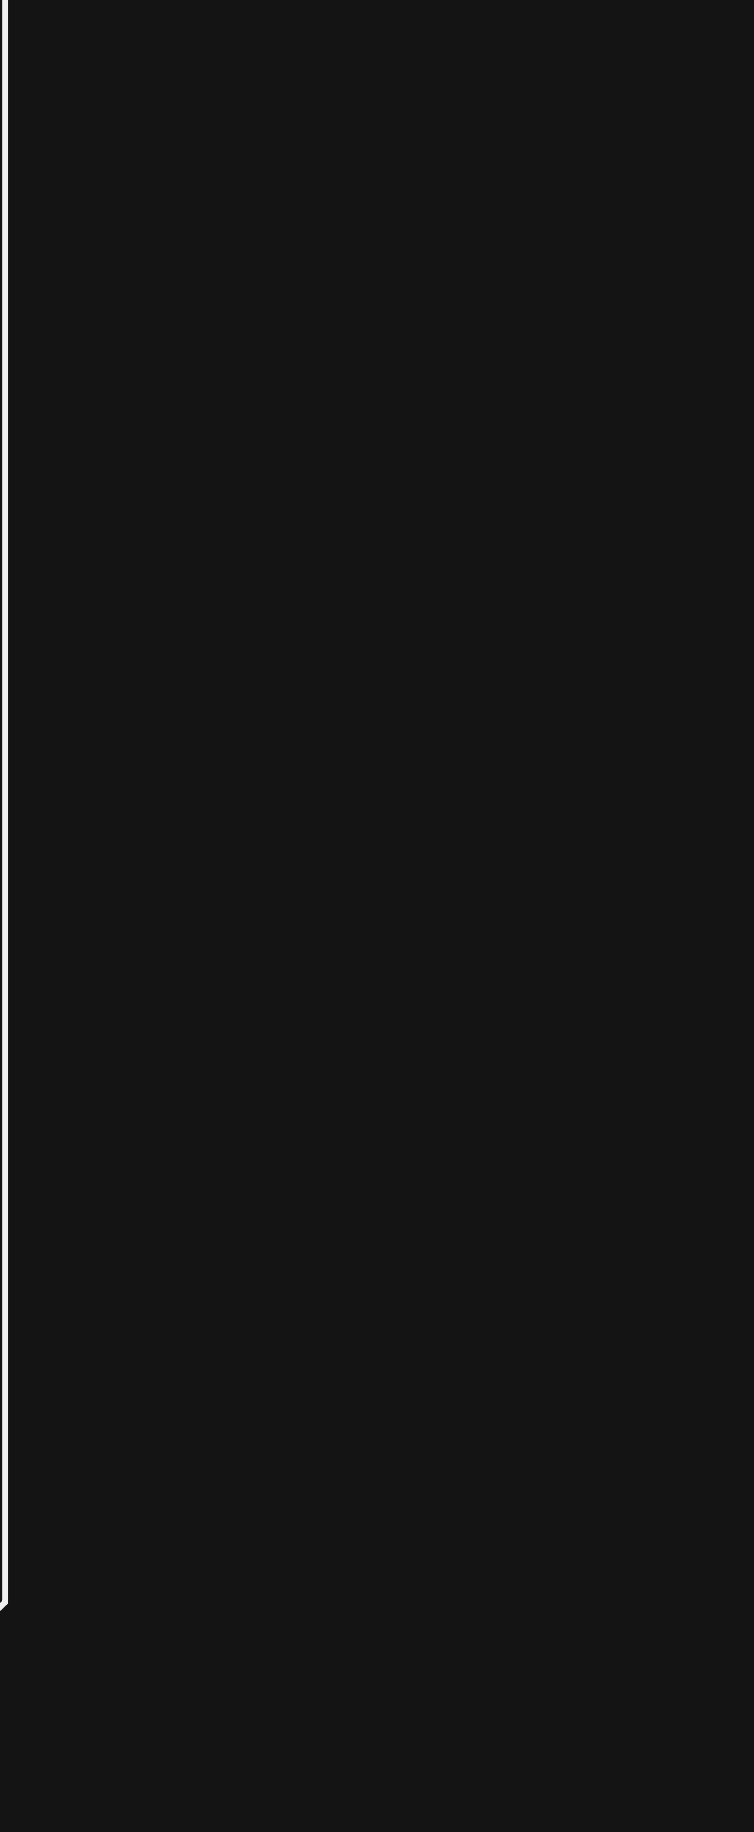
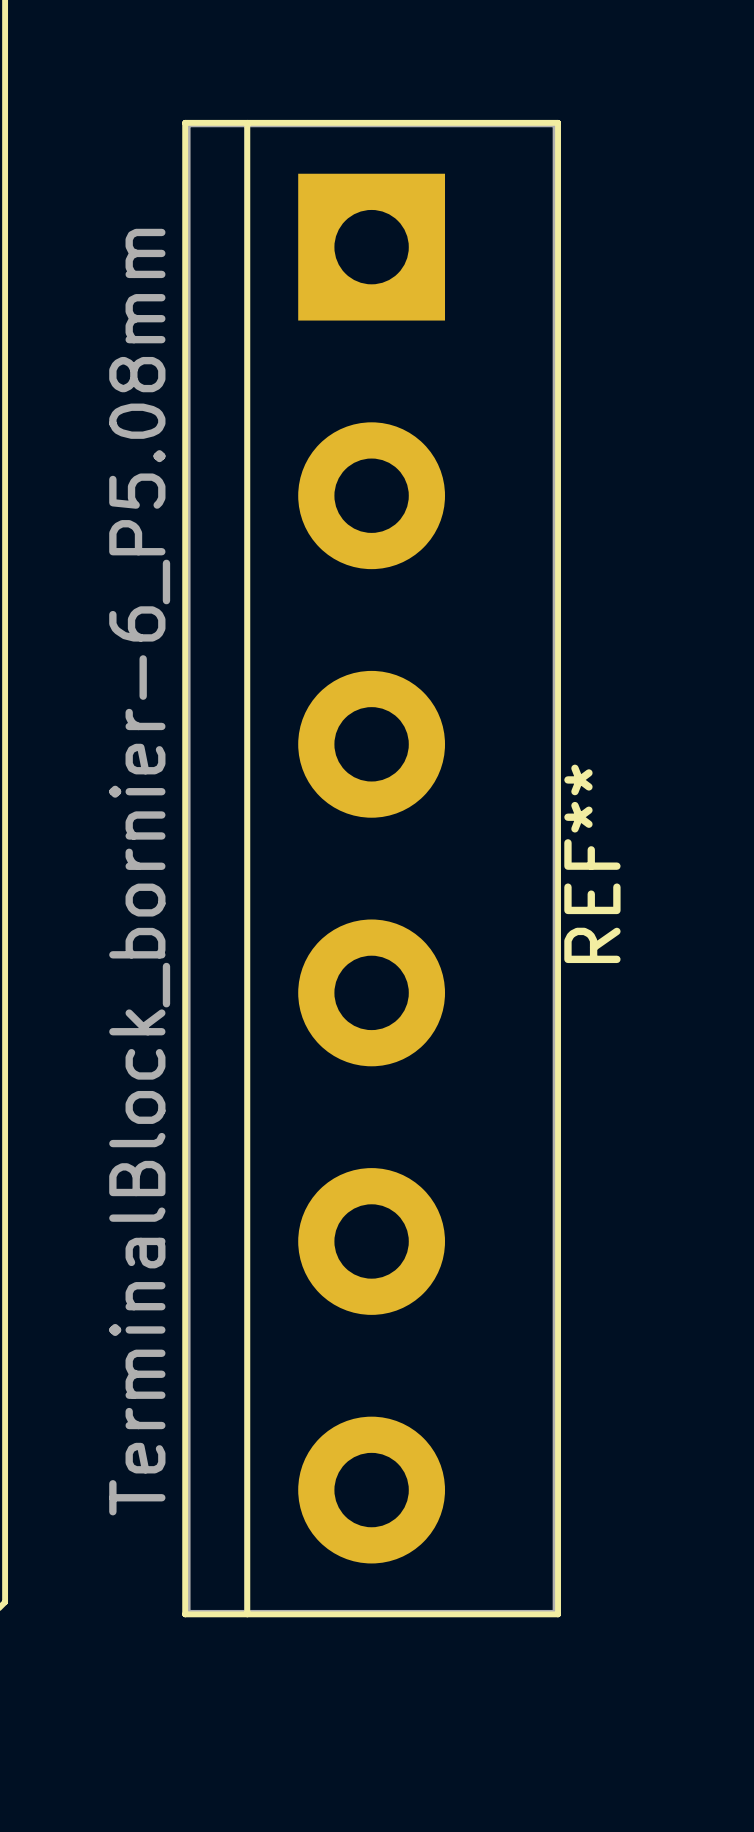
REF**: none -> TerminalBlock_bornier-6_P5.08mm (371, 868)

